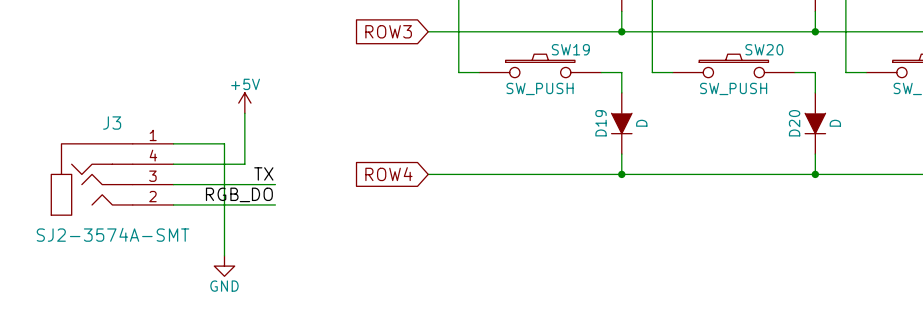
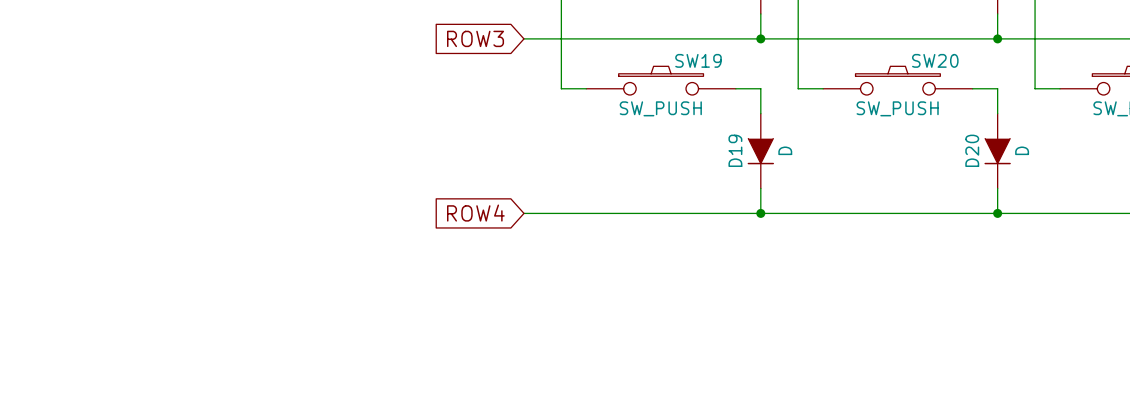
power symbol: +5V (244, 103) -> none
wire: (244, 113) (244, 164) (173, 164) -> none
wire: (173, 143) (224, 143) (224, 255) -> none
label: TX (263, 173) -> none
J3: SJ2-3574A-SMT (112, 179) -> none
wire: (173, 184) (275, 184) -> none
label: RGB_DO (239, 194) -> none
wire: (173, 204) (275, 204) -> none
power symbol: GND (224, 266) -> none

